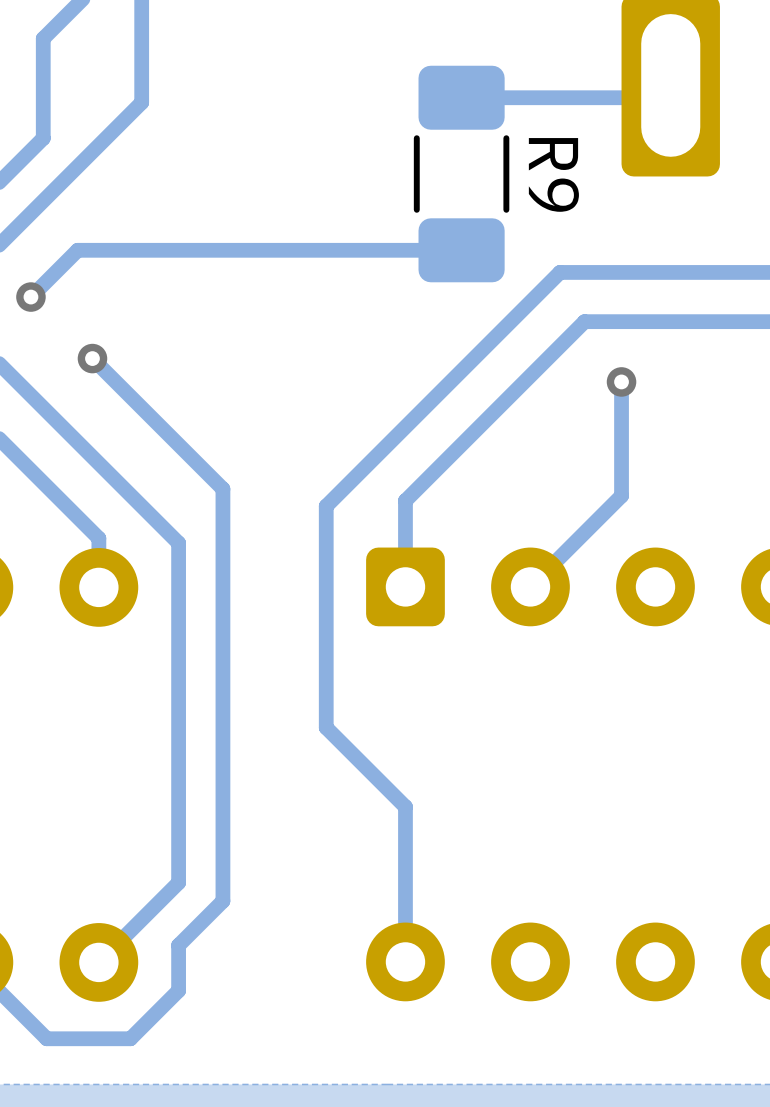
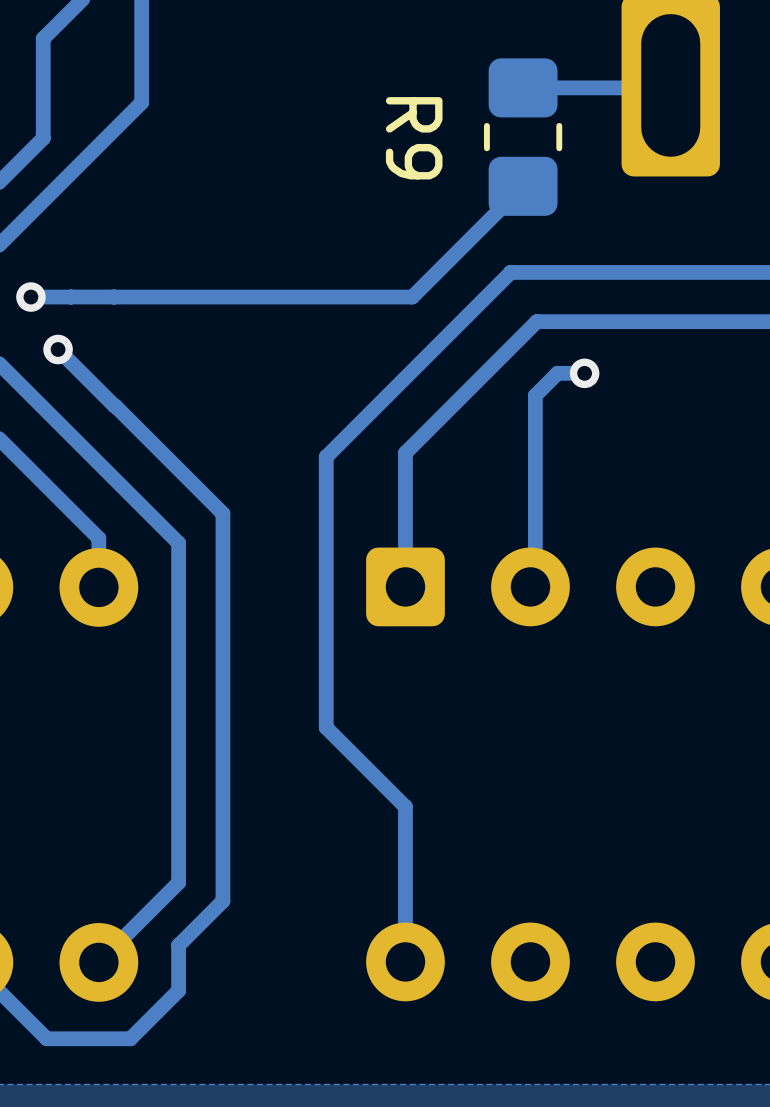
R9 footprint: [413, 65, 510, 283] -> [483, 58, 563, 216]
track: (668, 87) (658, 97) (461, 97) -> (668, 87) (523, 87)
R9 name position: R9 (553, 174) -> R9 (414, 138)
track: (461, 250) (77, 250) (30, 297) -> (523, 186) (412, 297) (30, 297)
track: (560, 272) (326, 506) -> (560, 272) (510, 272) (326, 456) (326, 506)
track: (584, 321) (405, 500) -> (584, 321) (536, 321) (405, 452) (405, 500)
track: none -> (58, 349) (114, 406)
track: (92, 358) (222, 489) (222, 513) -> (115, 406) (222, 513)
via position: (92, 358) -> (58, 349)
track: (621, 381) (621, 495) (535, 582) -> (584, 373) (557, 373) (535, 395) (535, 582)
via position: (621, 381) -> (584, 373)

